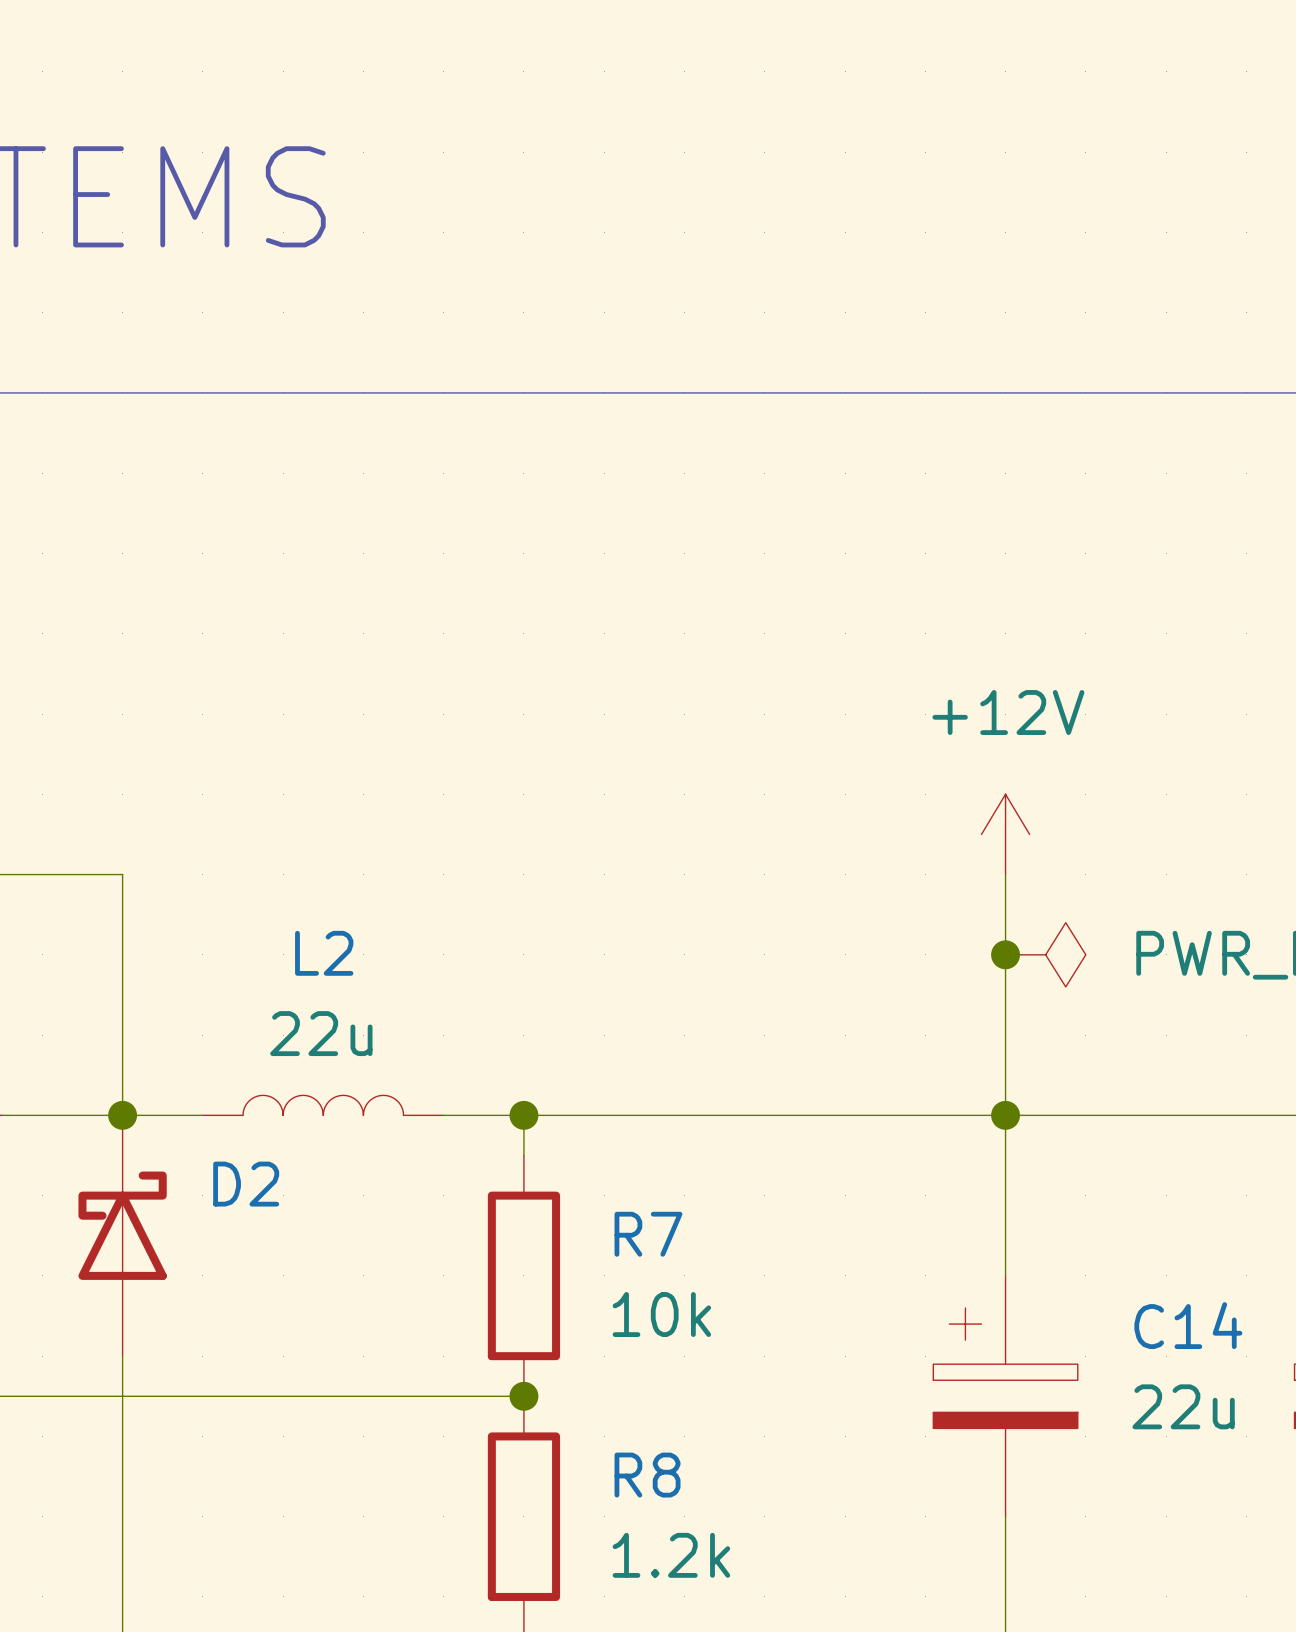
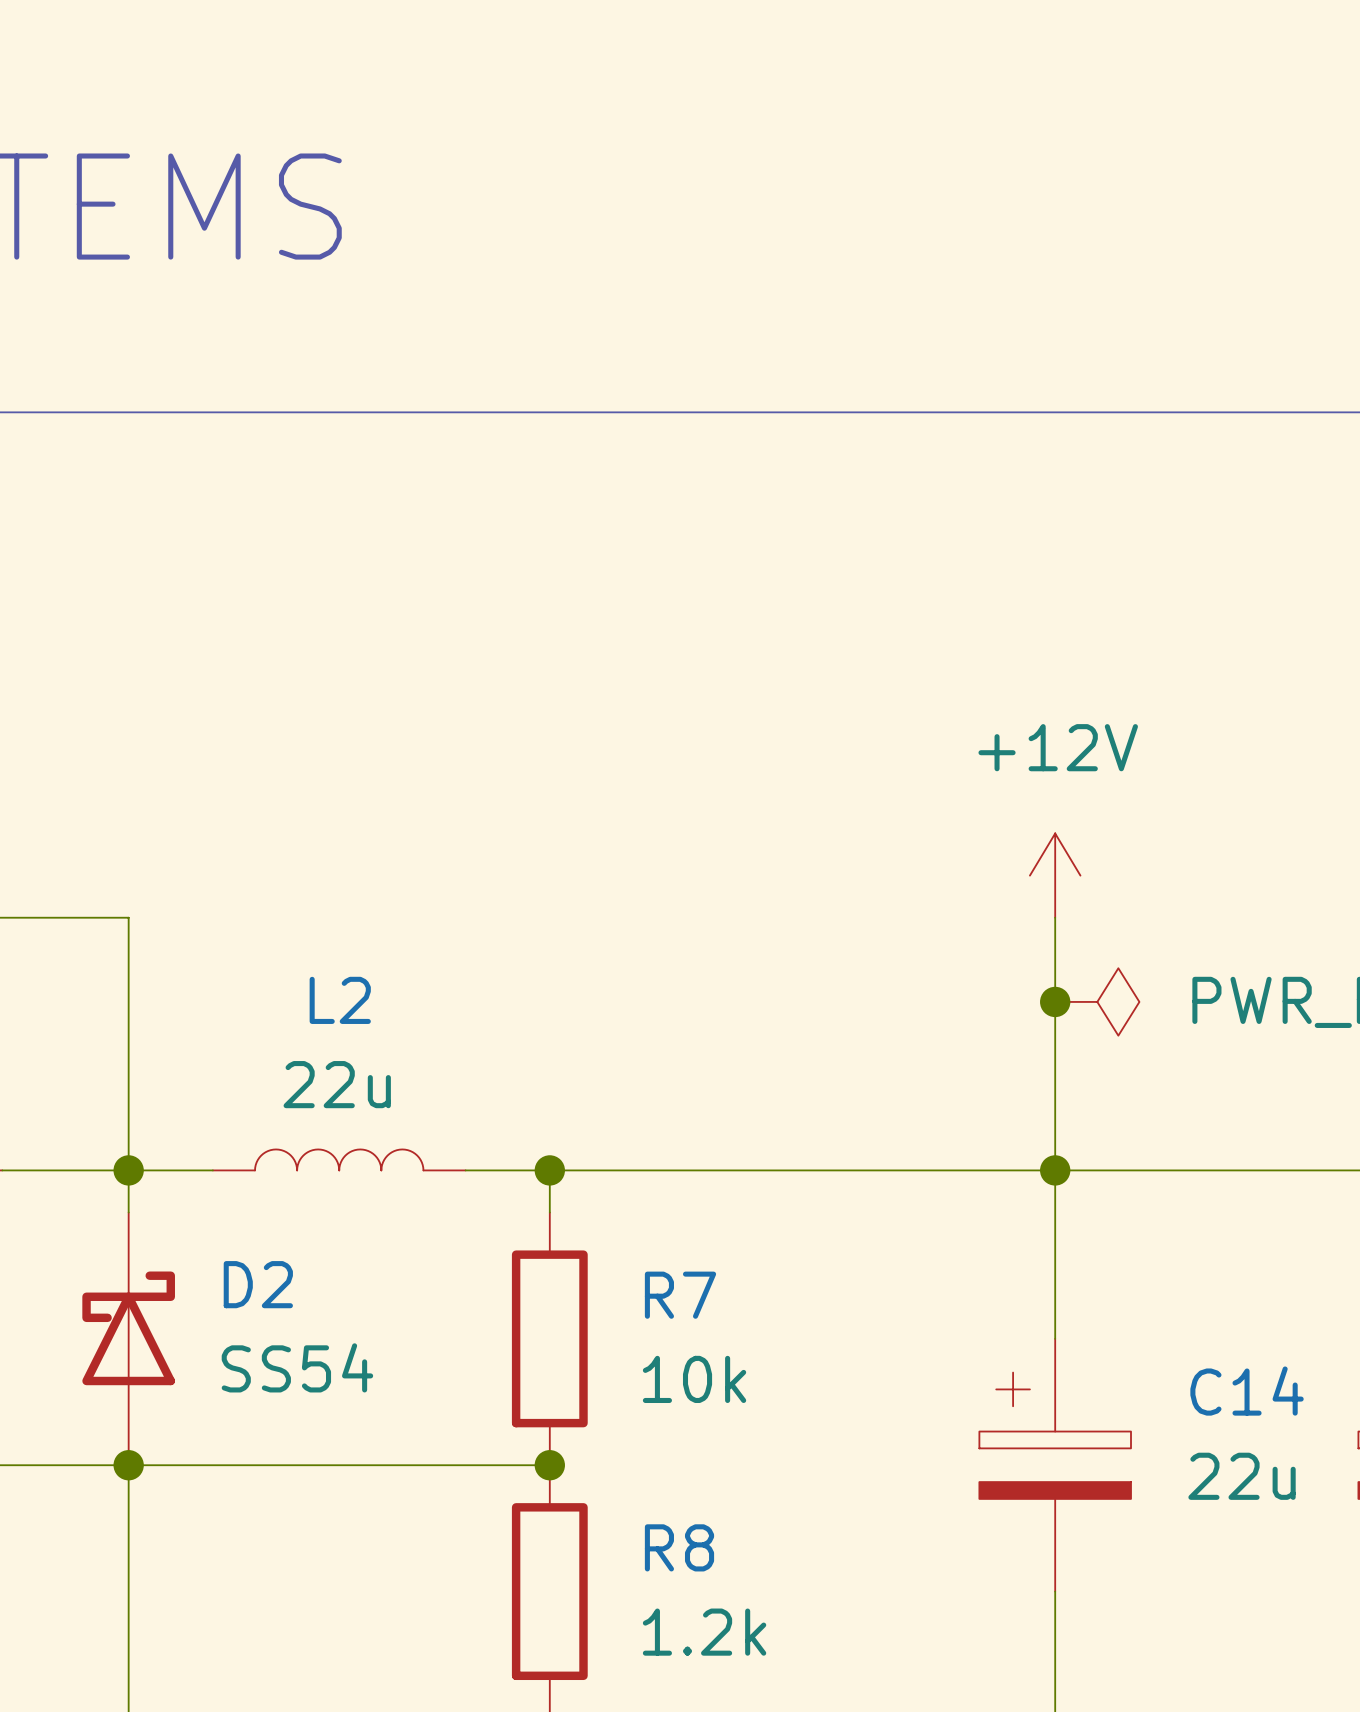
D2 position: (122, 1235) -> (128, 1338)
D2 value: none -> SS54 (297, 1367)
junction: none -> (128, 1465)

